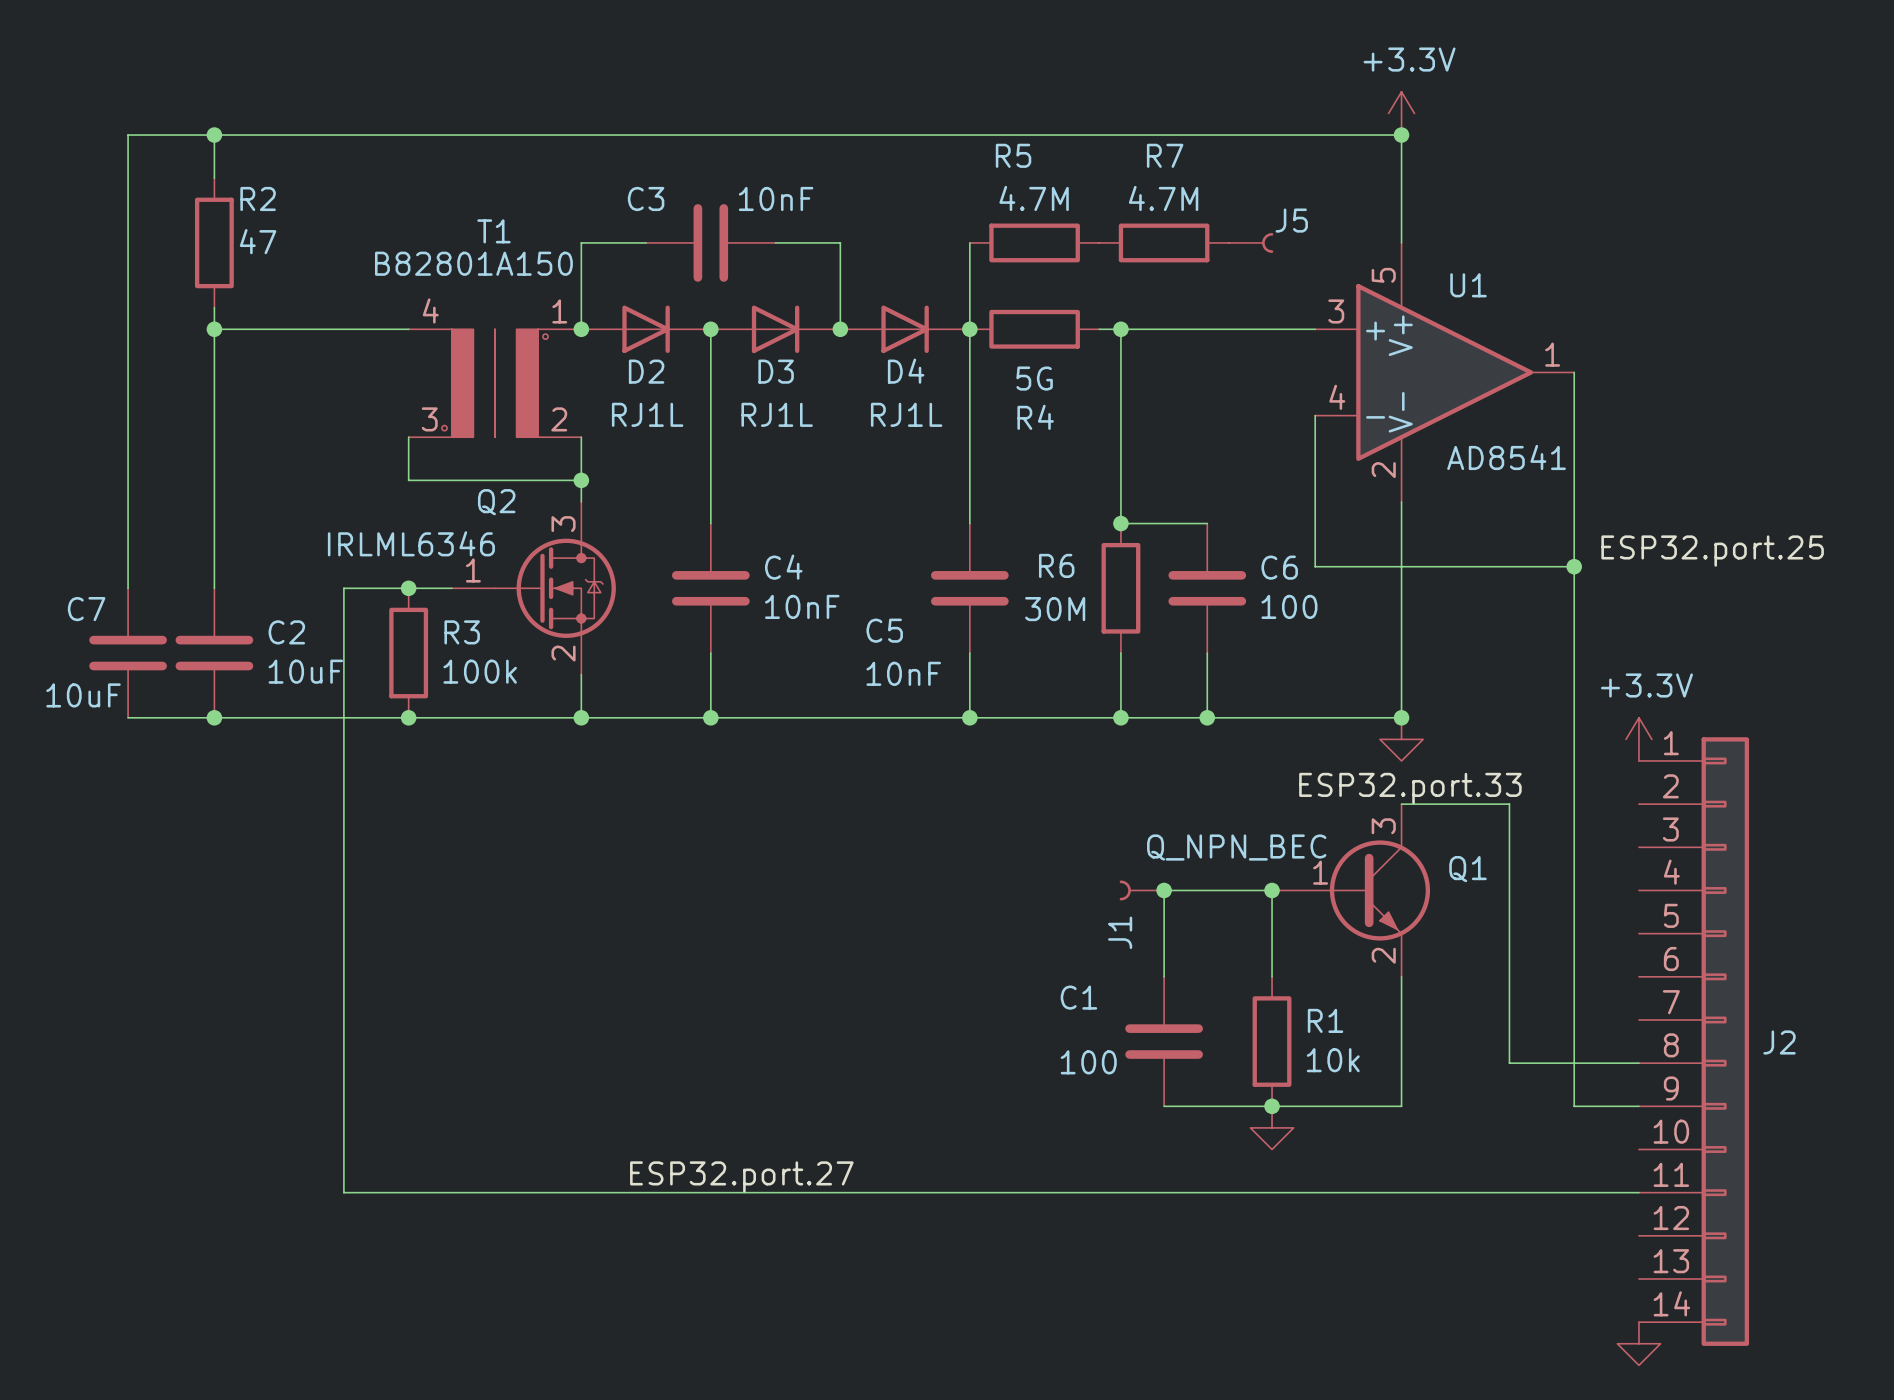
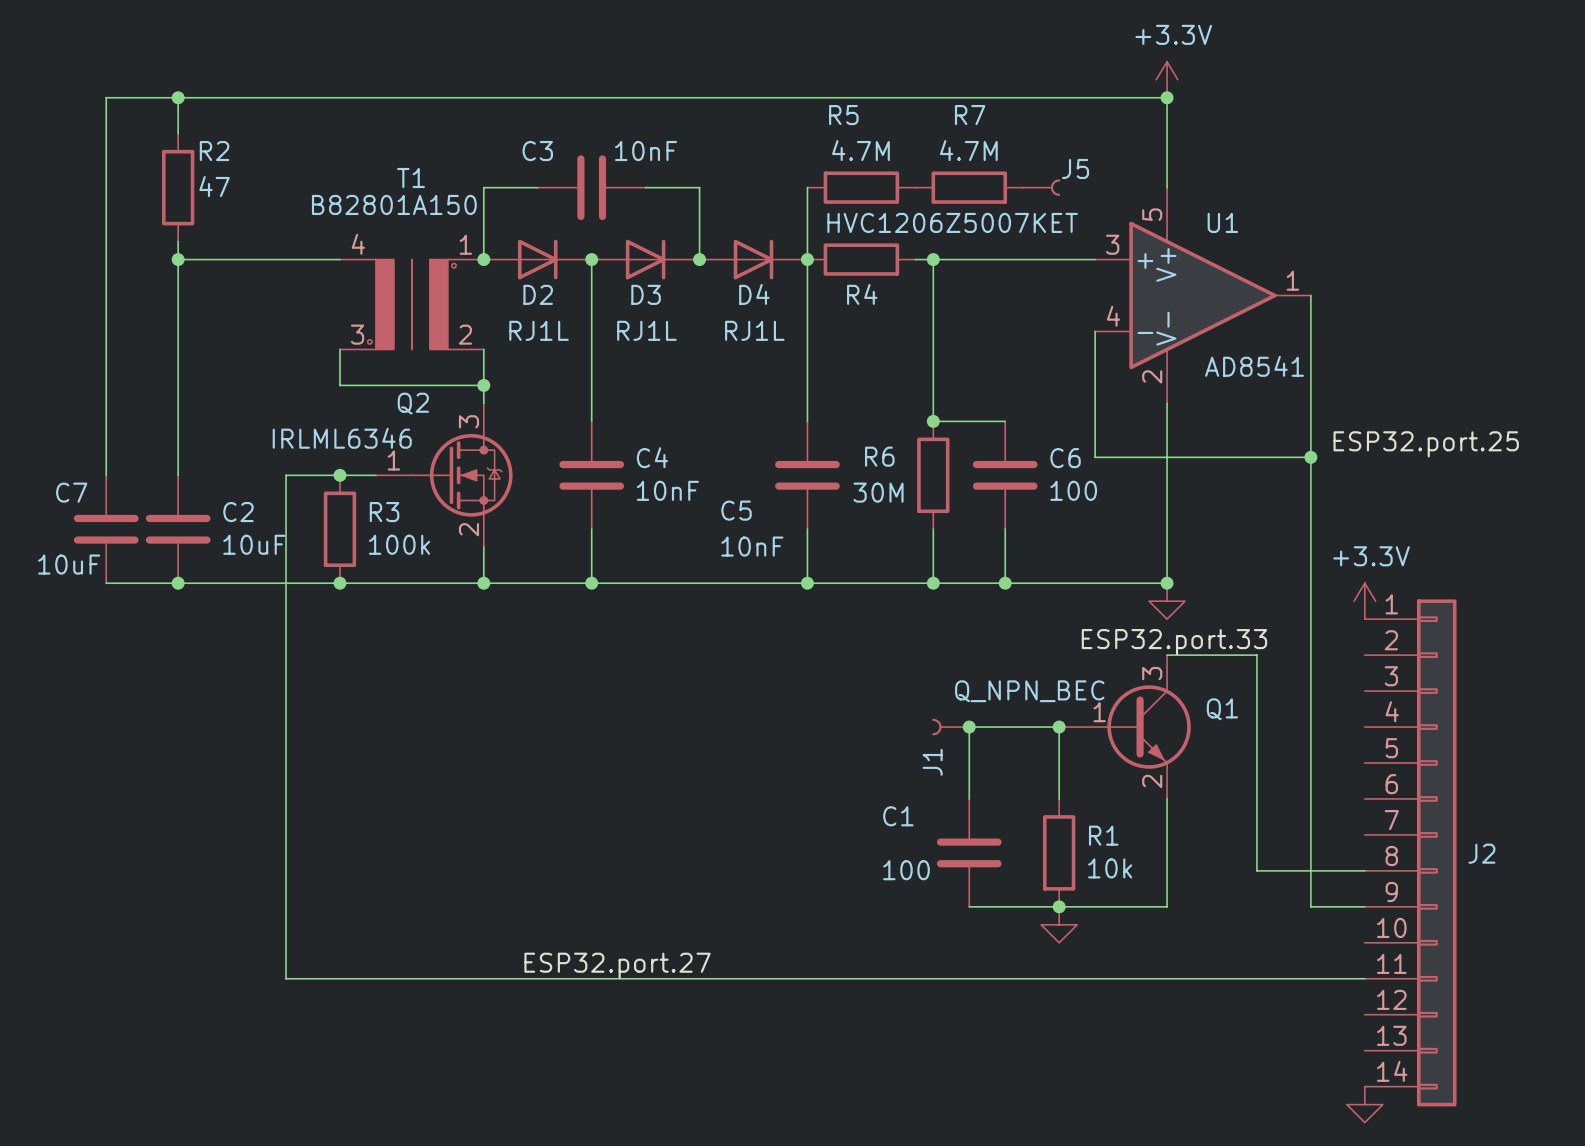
R4 value: 5G (1034, 378) -> HVC1206Z5007KET (952, 222)
R4 name position: R4 (1035, 417) -> R4 (862, 294)

